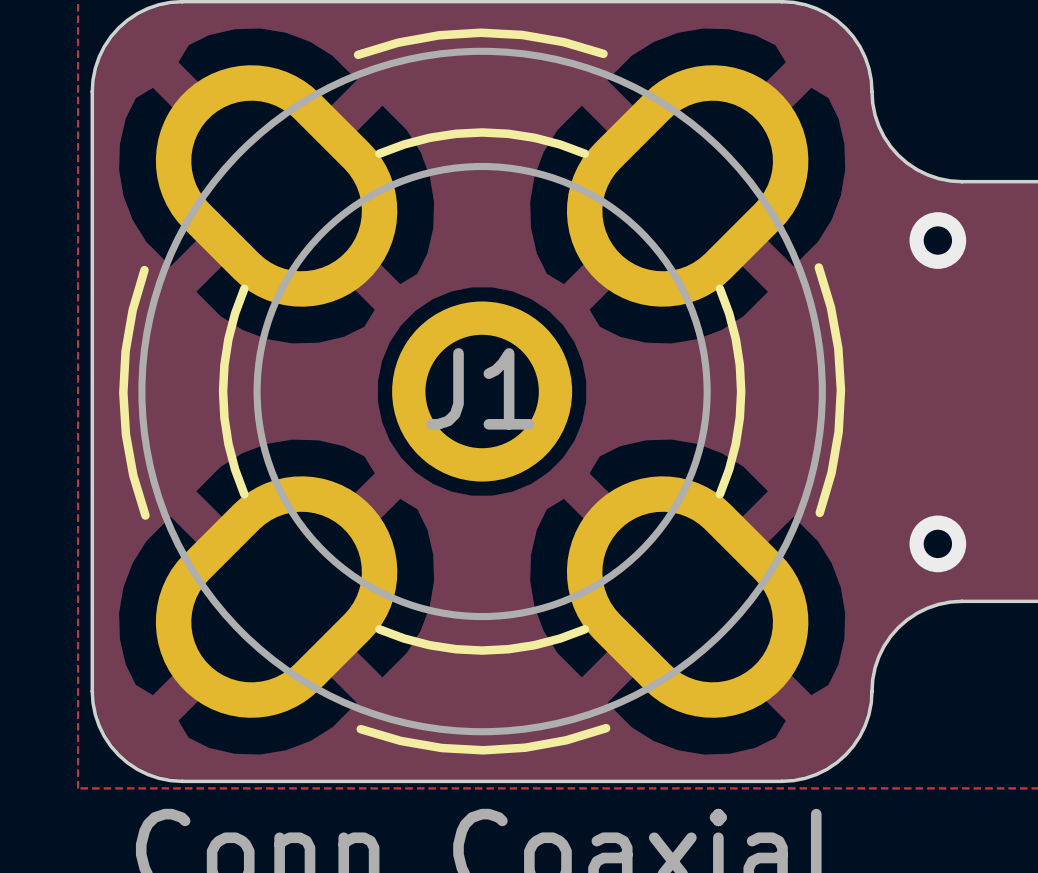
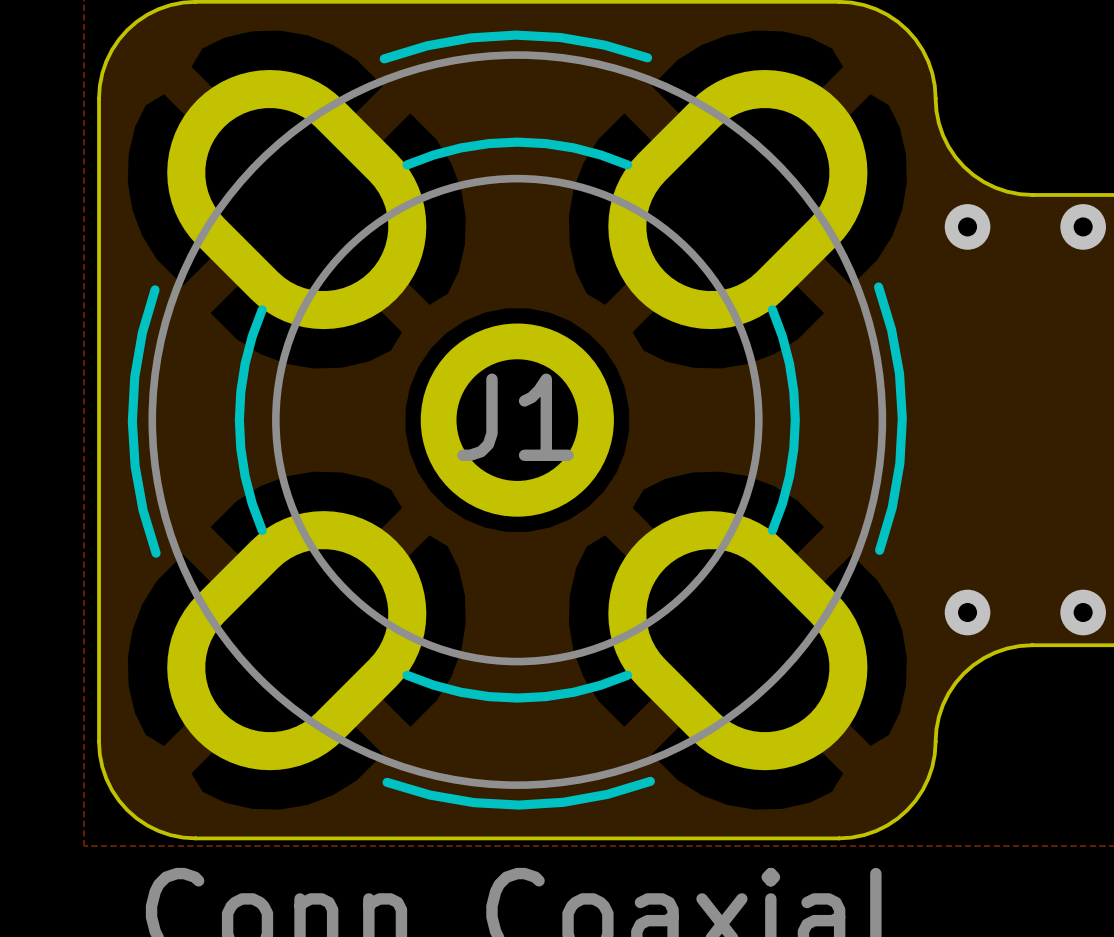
via: none -> (1083, 226)
via position: (937, 240) -> (967, 226)
via position: (937, 543) -> (967, 612)
via: none -> (1083, 612)

